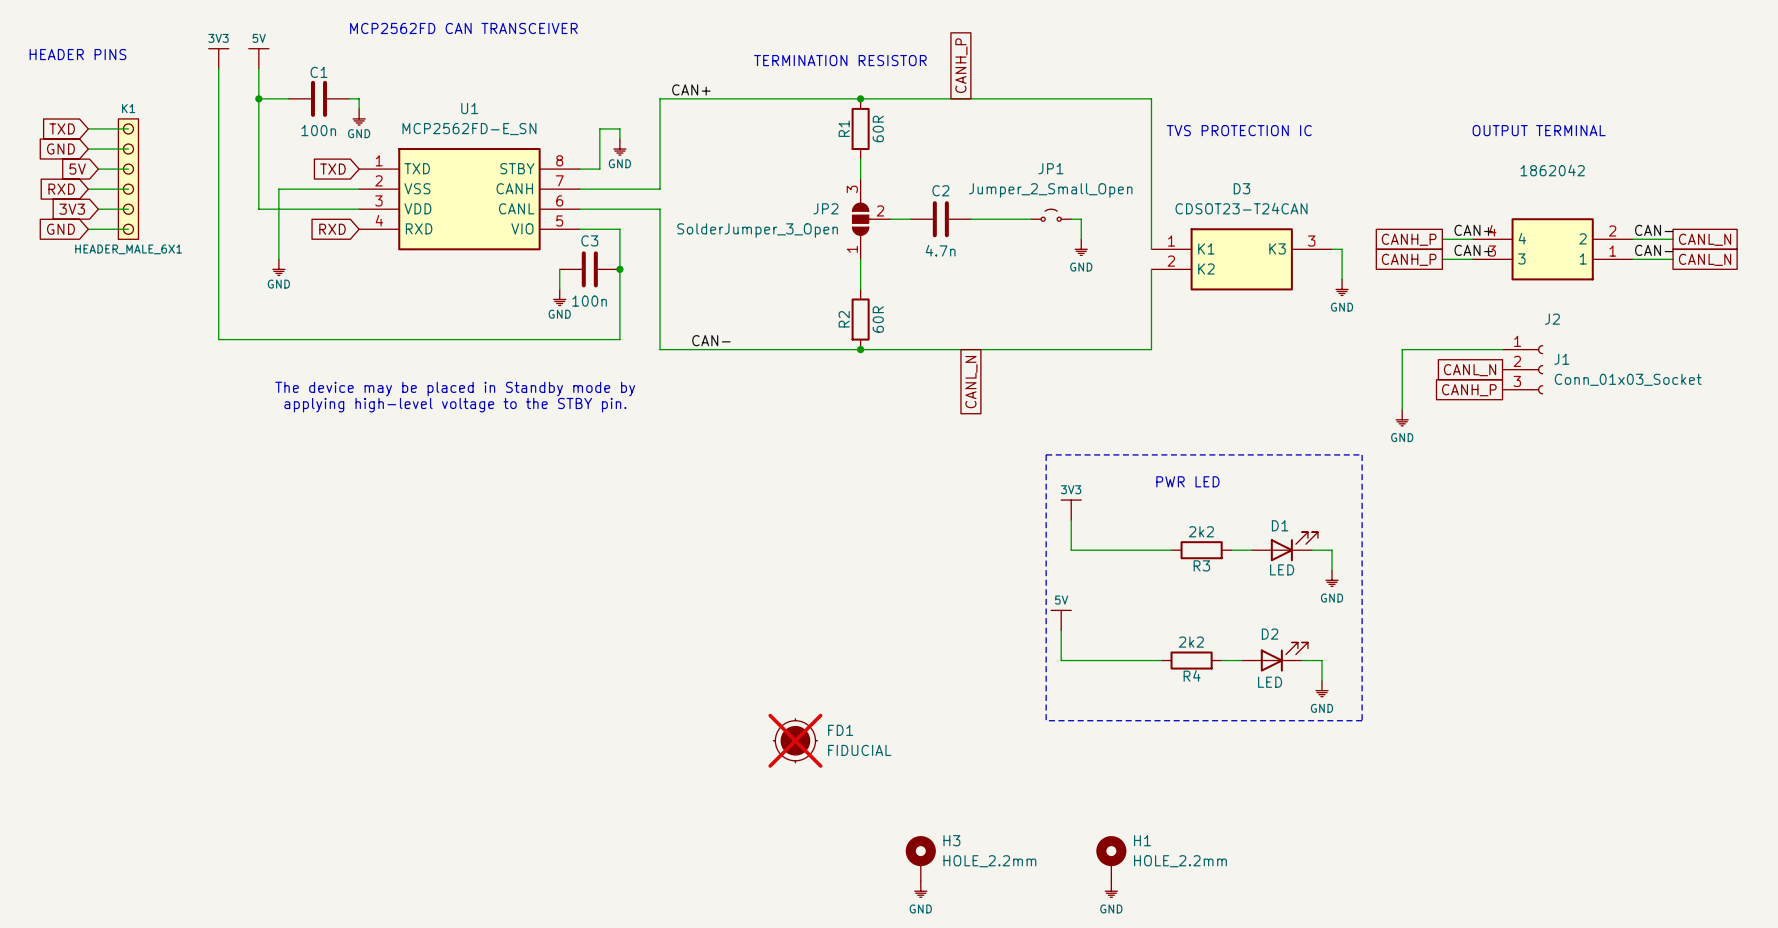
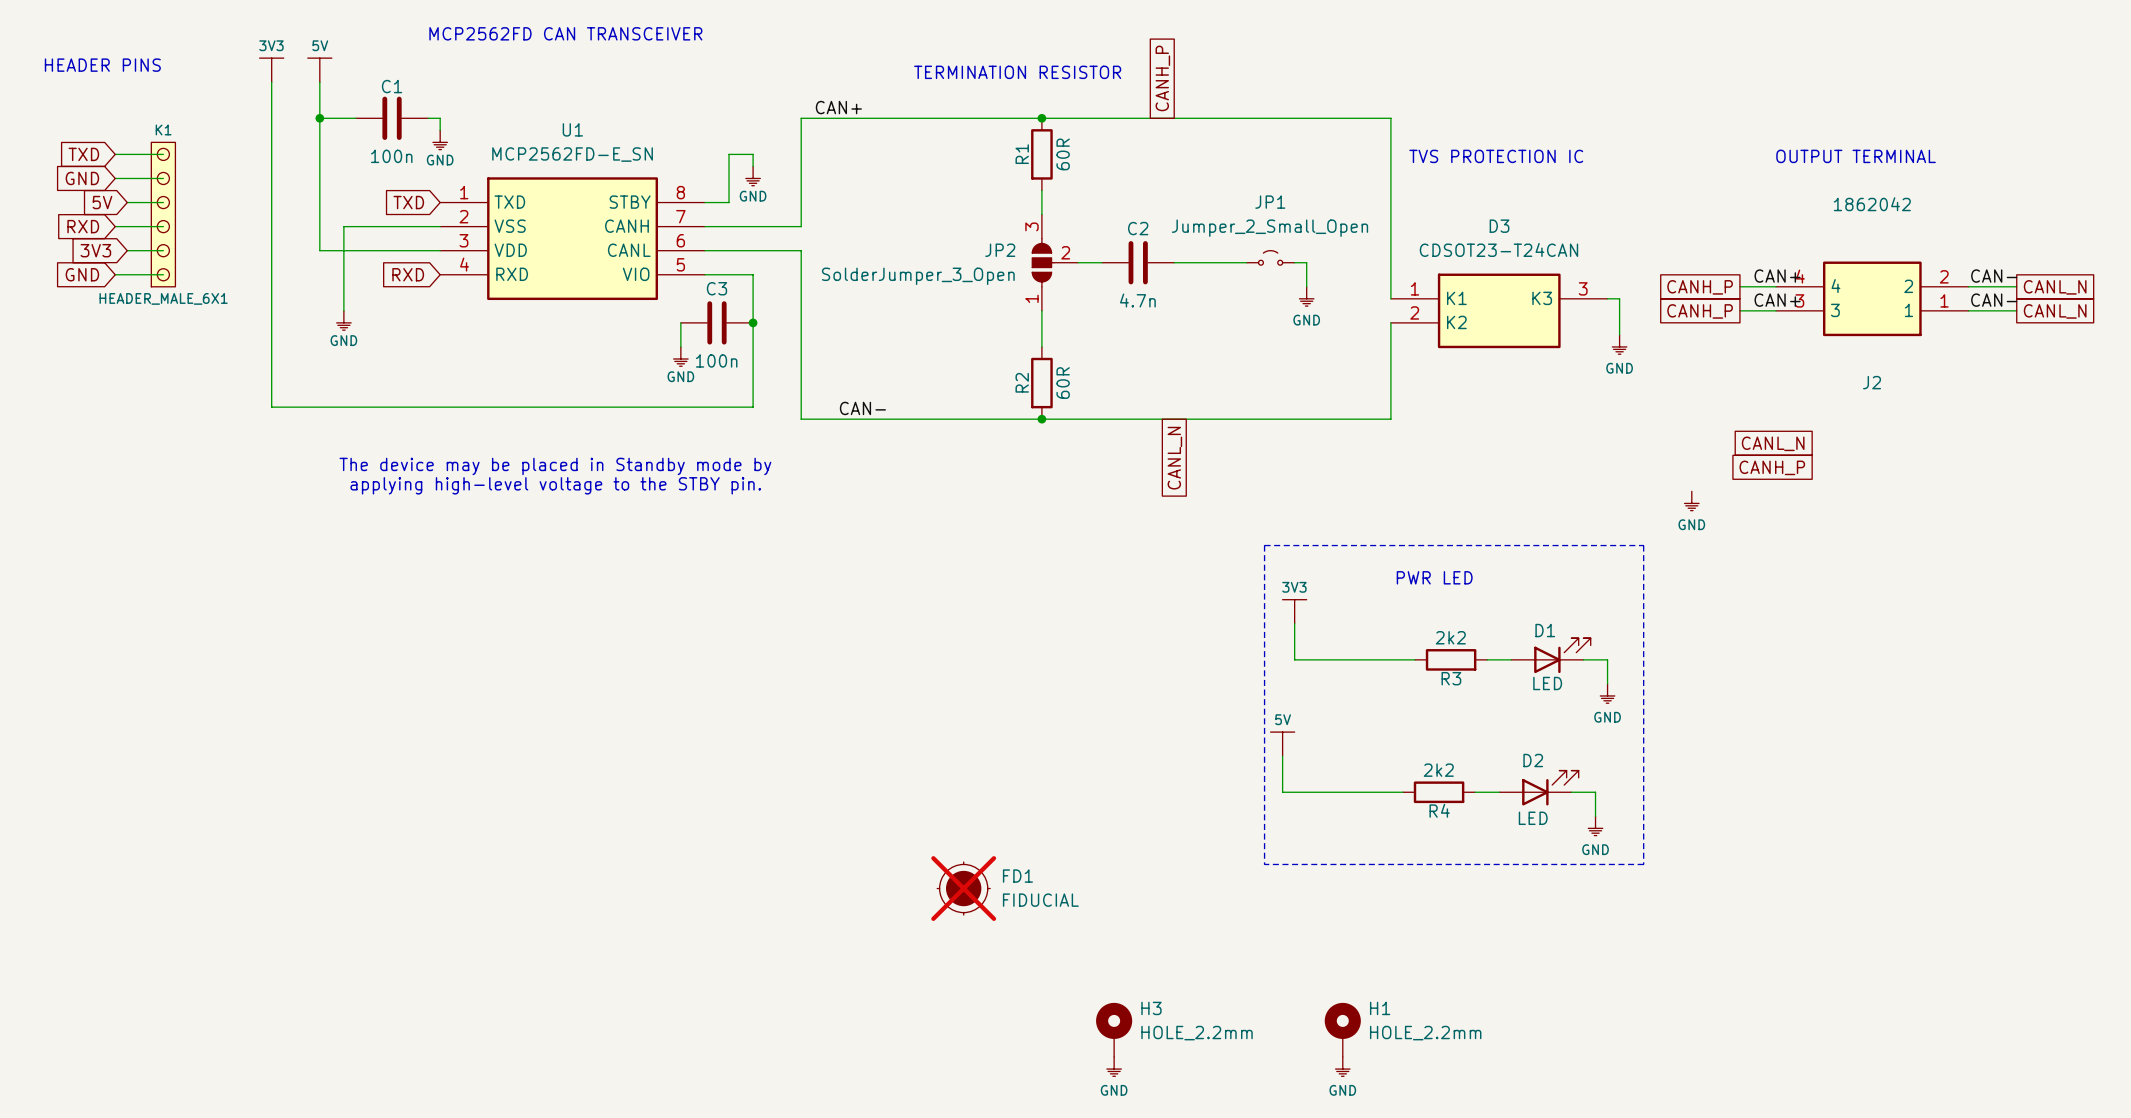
wire: (1502, 349) (1402, 349) (1402, 409) -> none
J1: Conn_01x03_Socket (1522, 369) -> none

